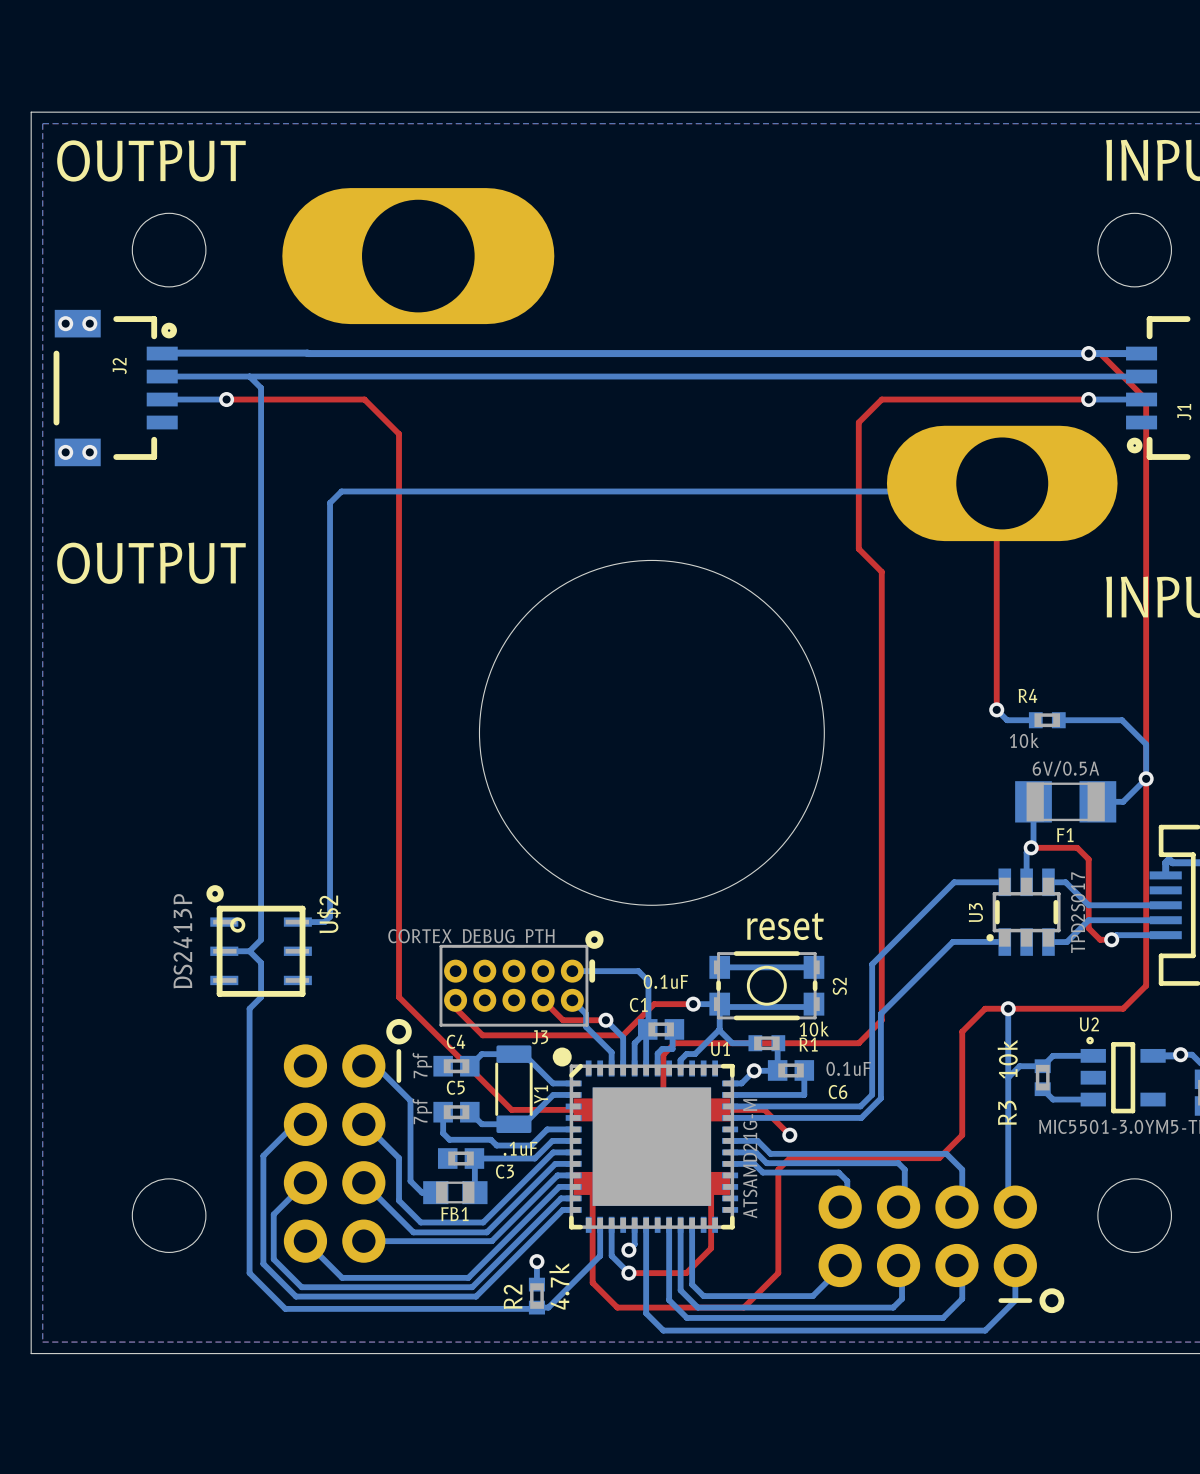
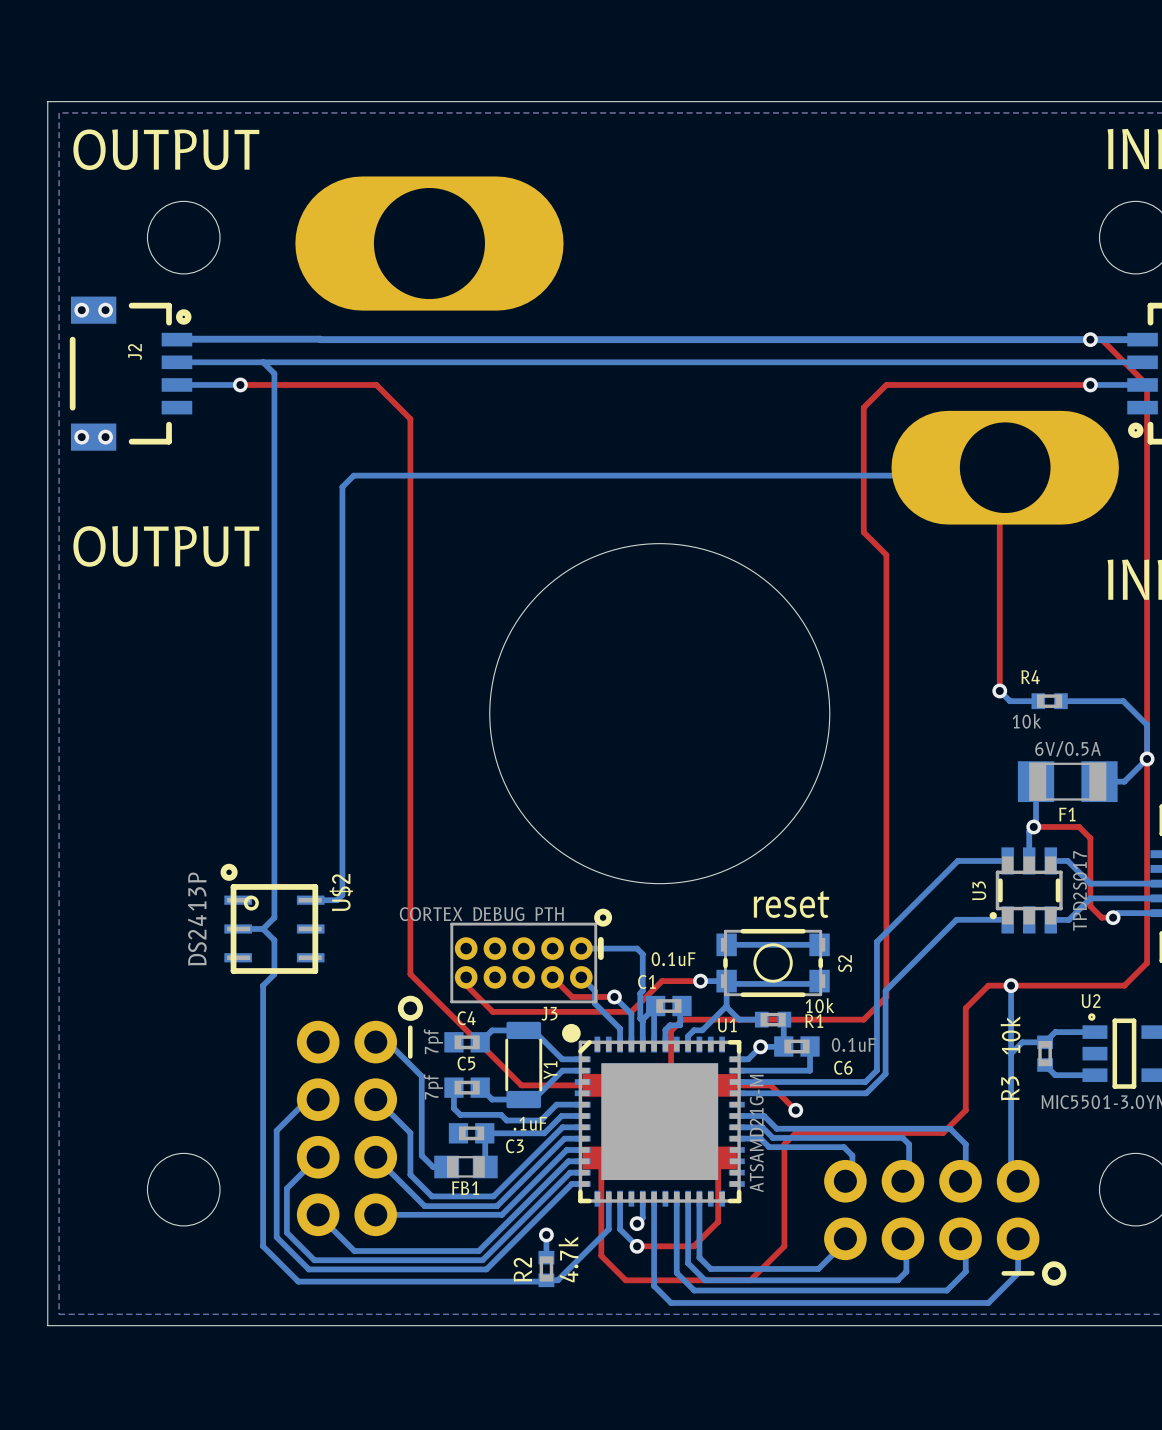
bottom track: (628, 971) (638, 971) (648, 981) (647, 1029) -> (637, 948) (642, 954) (642, 990) (640, 993) (640, 1018) (642, 1021)

